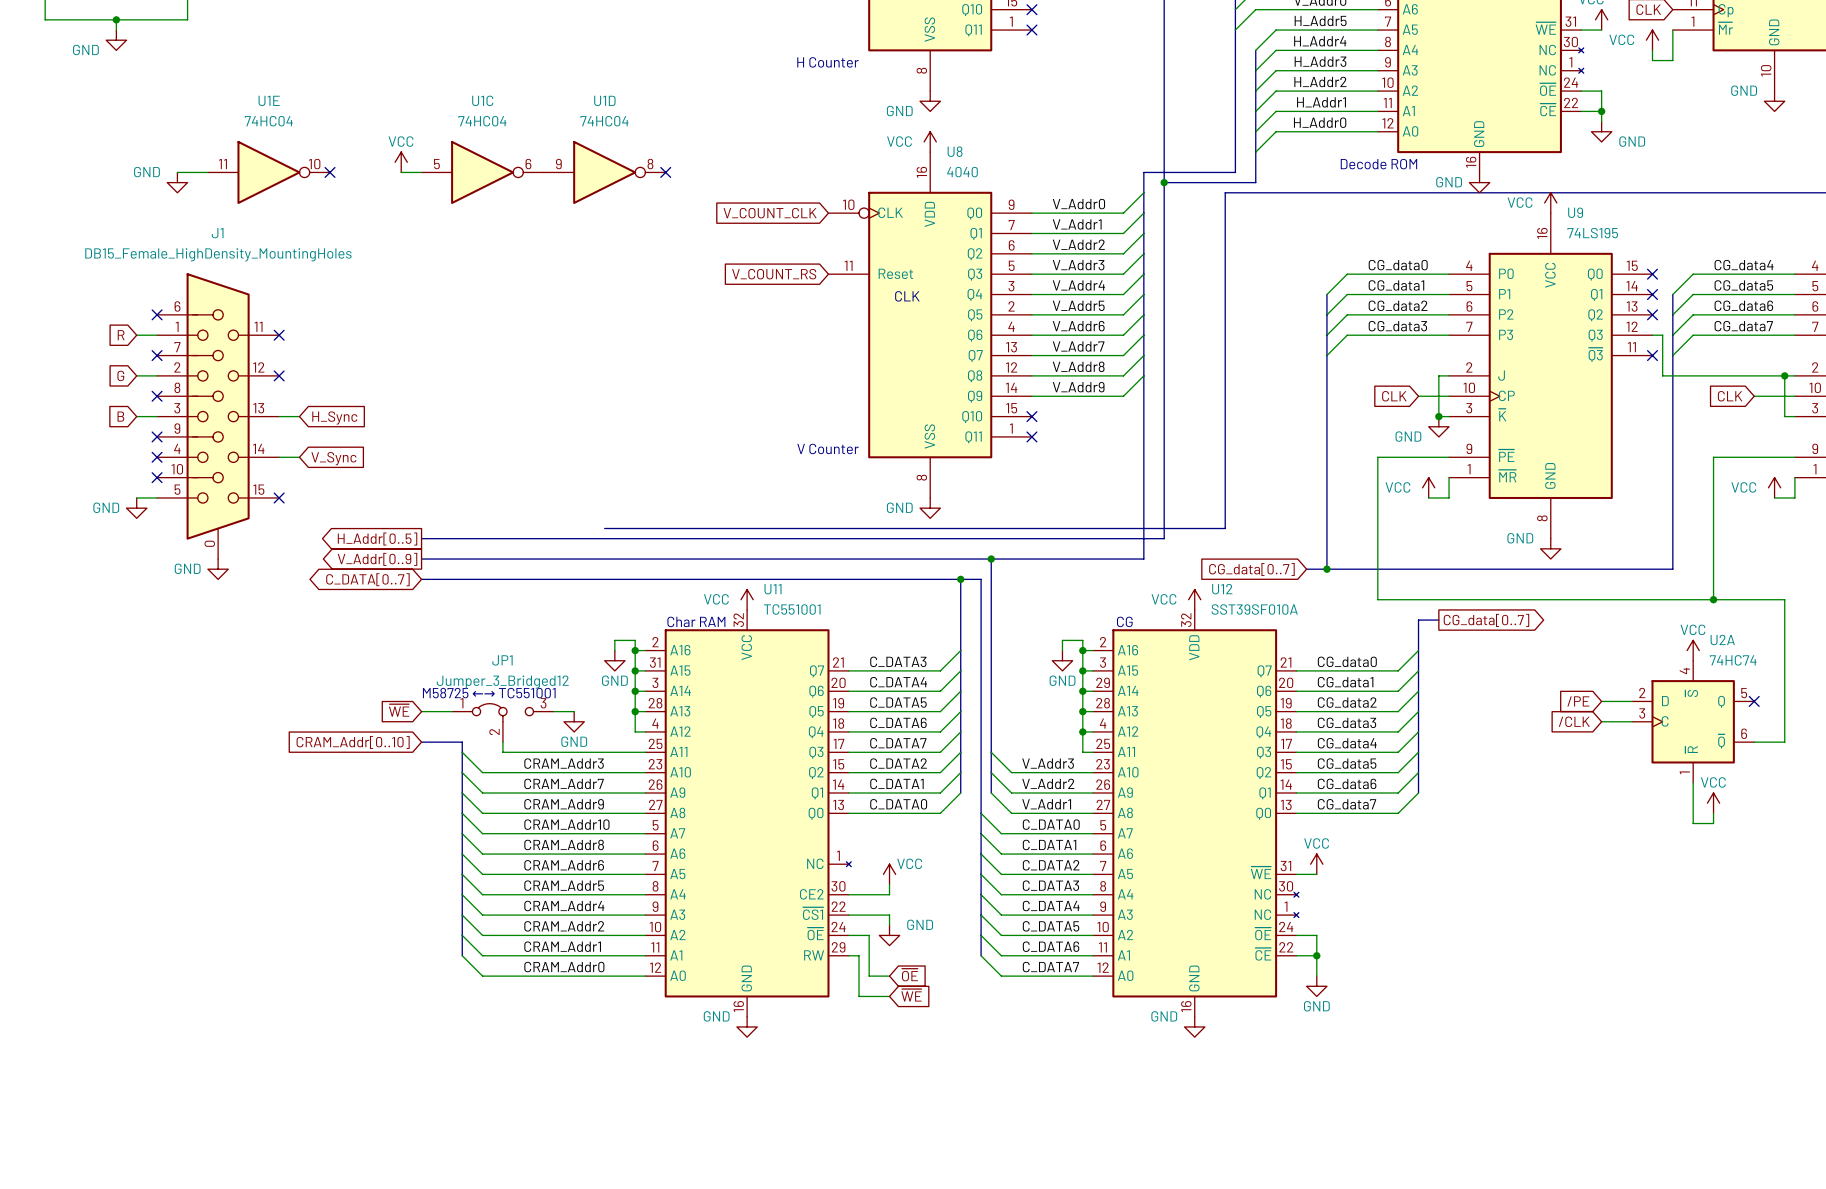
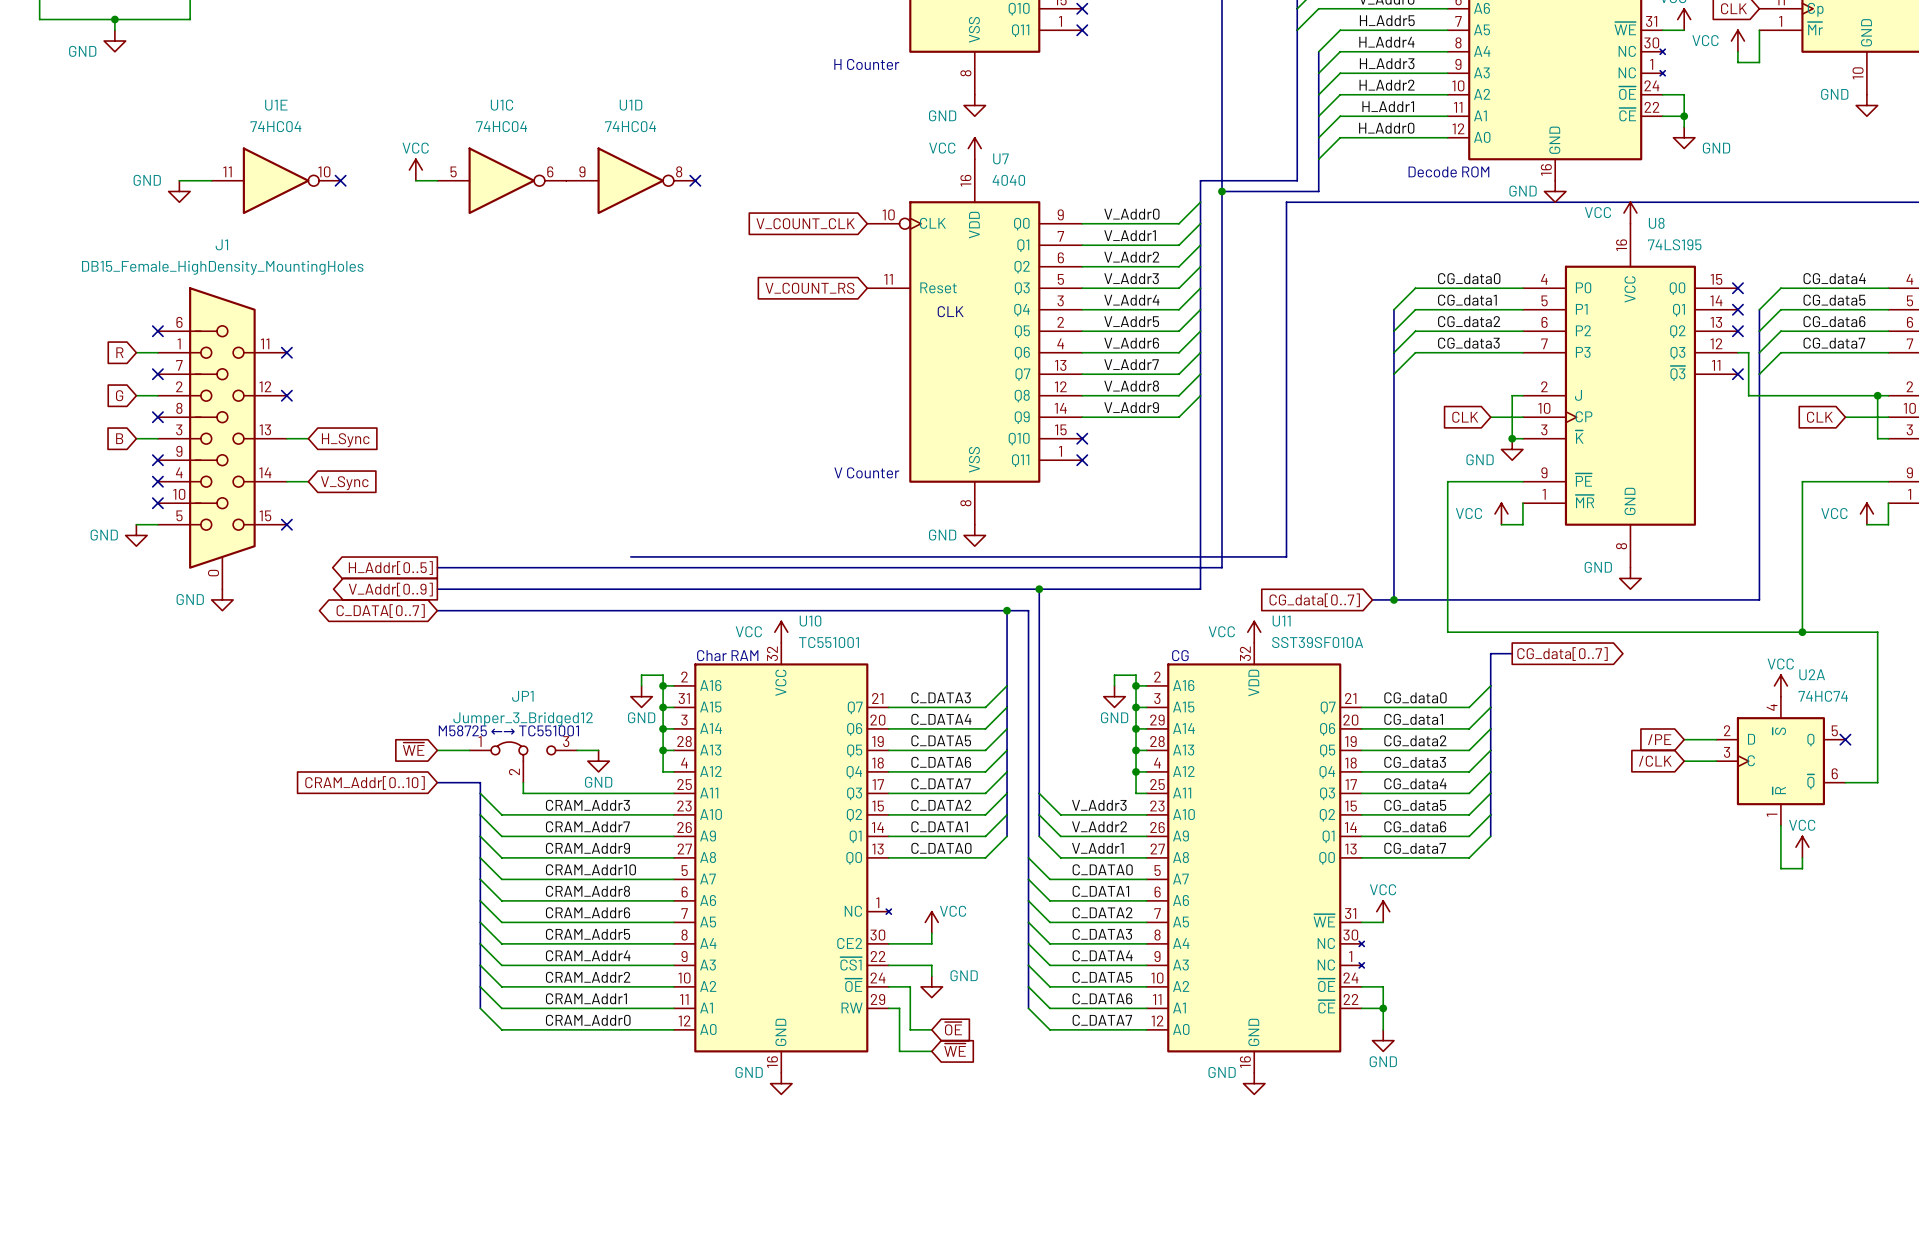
U8 name: U8 (955, 151) -> U7 (1000, 158)
U9 name: U9 (1575, 212) -> U8 (1656, 223)
U11 name: U11 (773, 589) -> U10 (810, 621)
U12 name: U12 (1222, 589) -> U11 (1281, 621)

